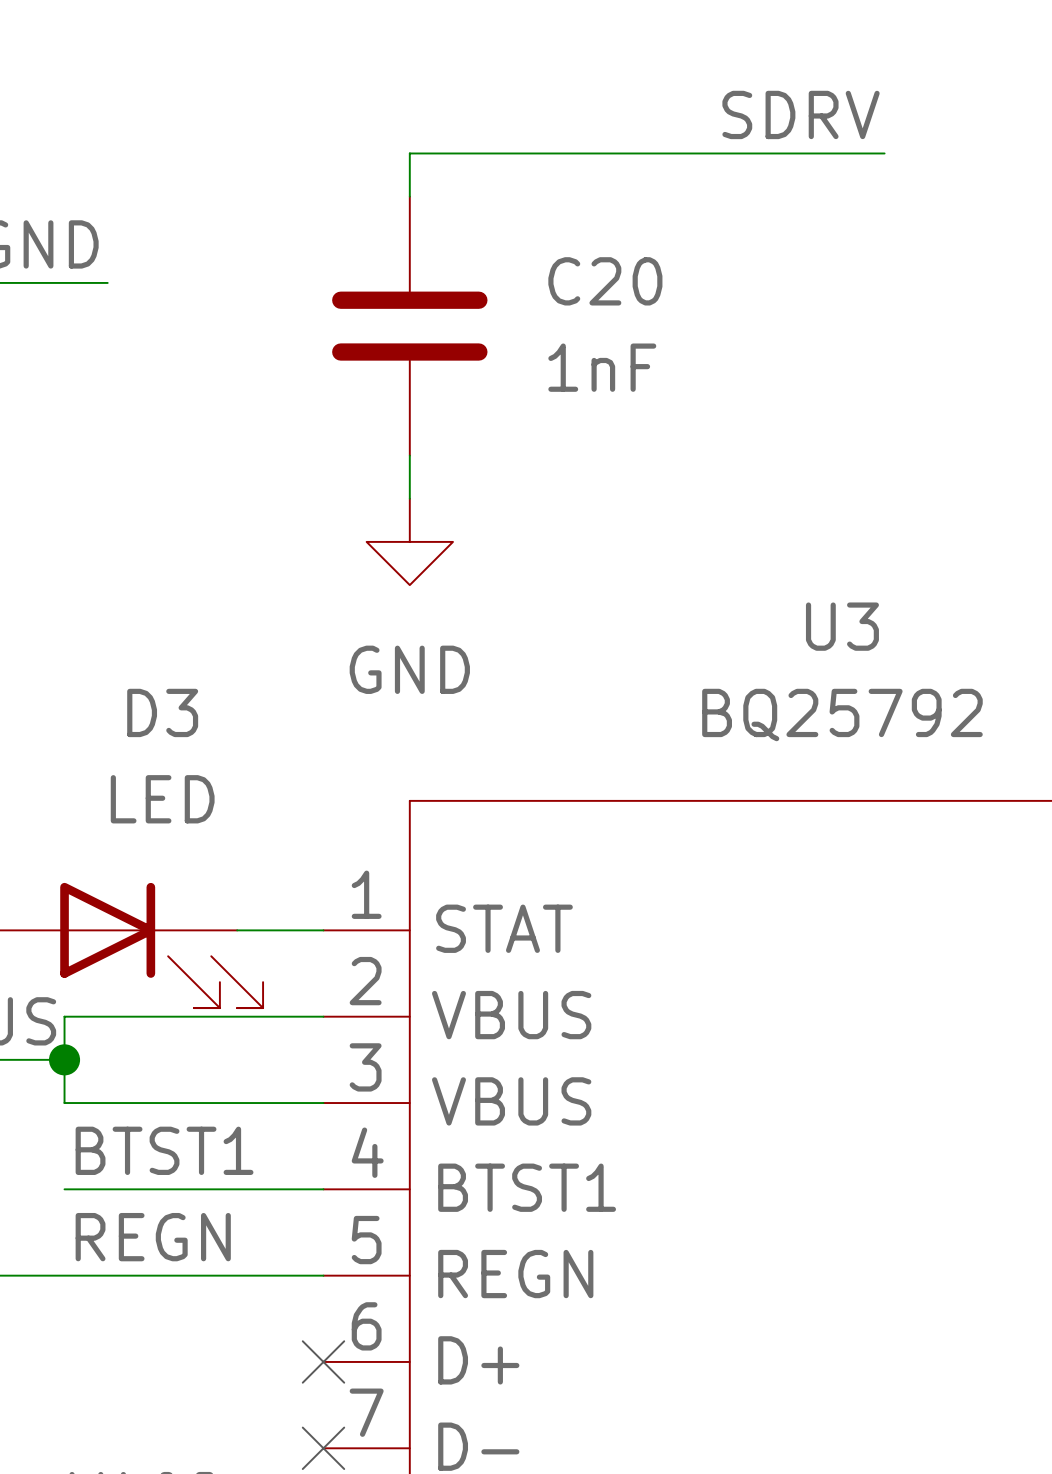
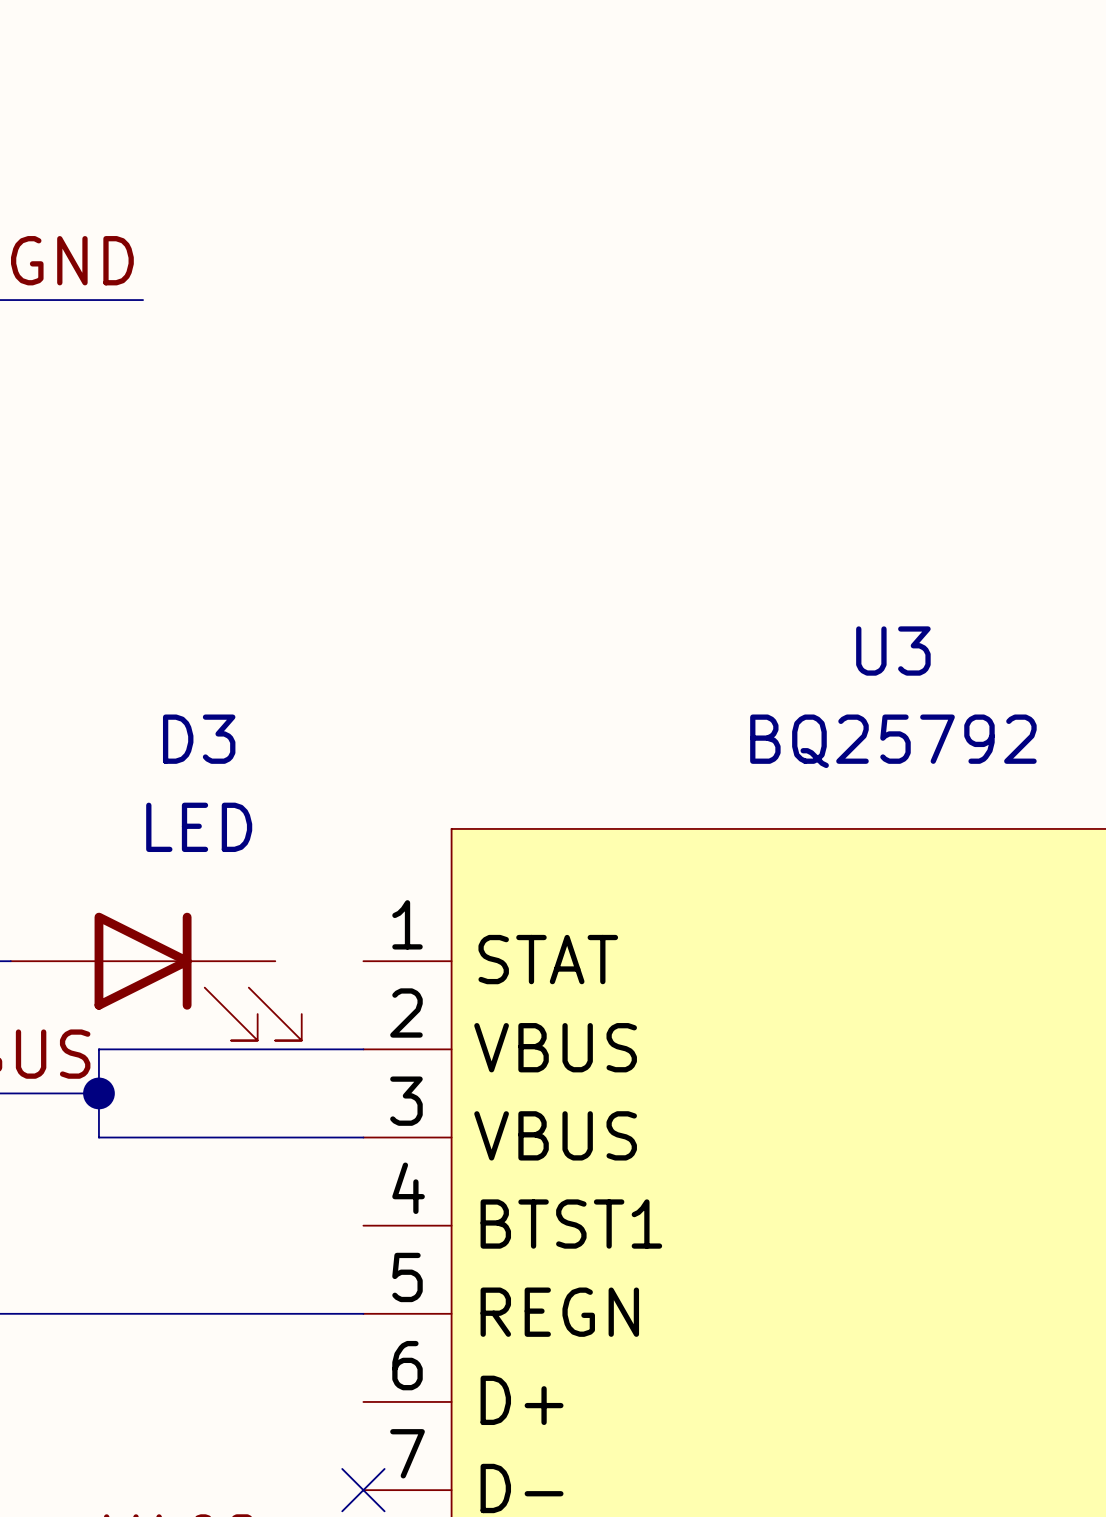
label: SDRV (801, 114) -> none
wire: (884, 153) (409, 153) (409, 196) -> none
C20: 1nF (409, 326) -> none
wire: (409, 455) (409, 498) -> none
power symbol: GND (409, 541) -> none
wire: (237, 930) (323, 930) -> none
label: BTST1 (164, 1150) -> none
wire: (64, 1189) (323, 1189) -> none
label: REGN (153, 1237) -> none
no-connect mark: (323, 1361) -> none

